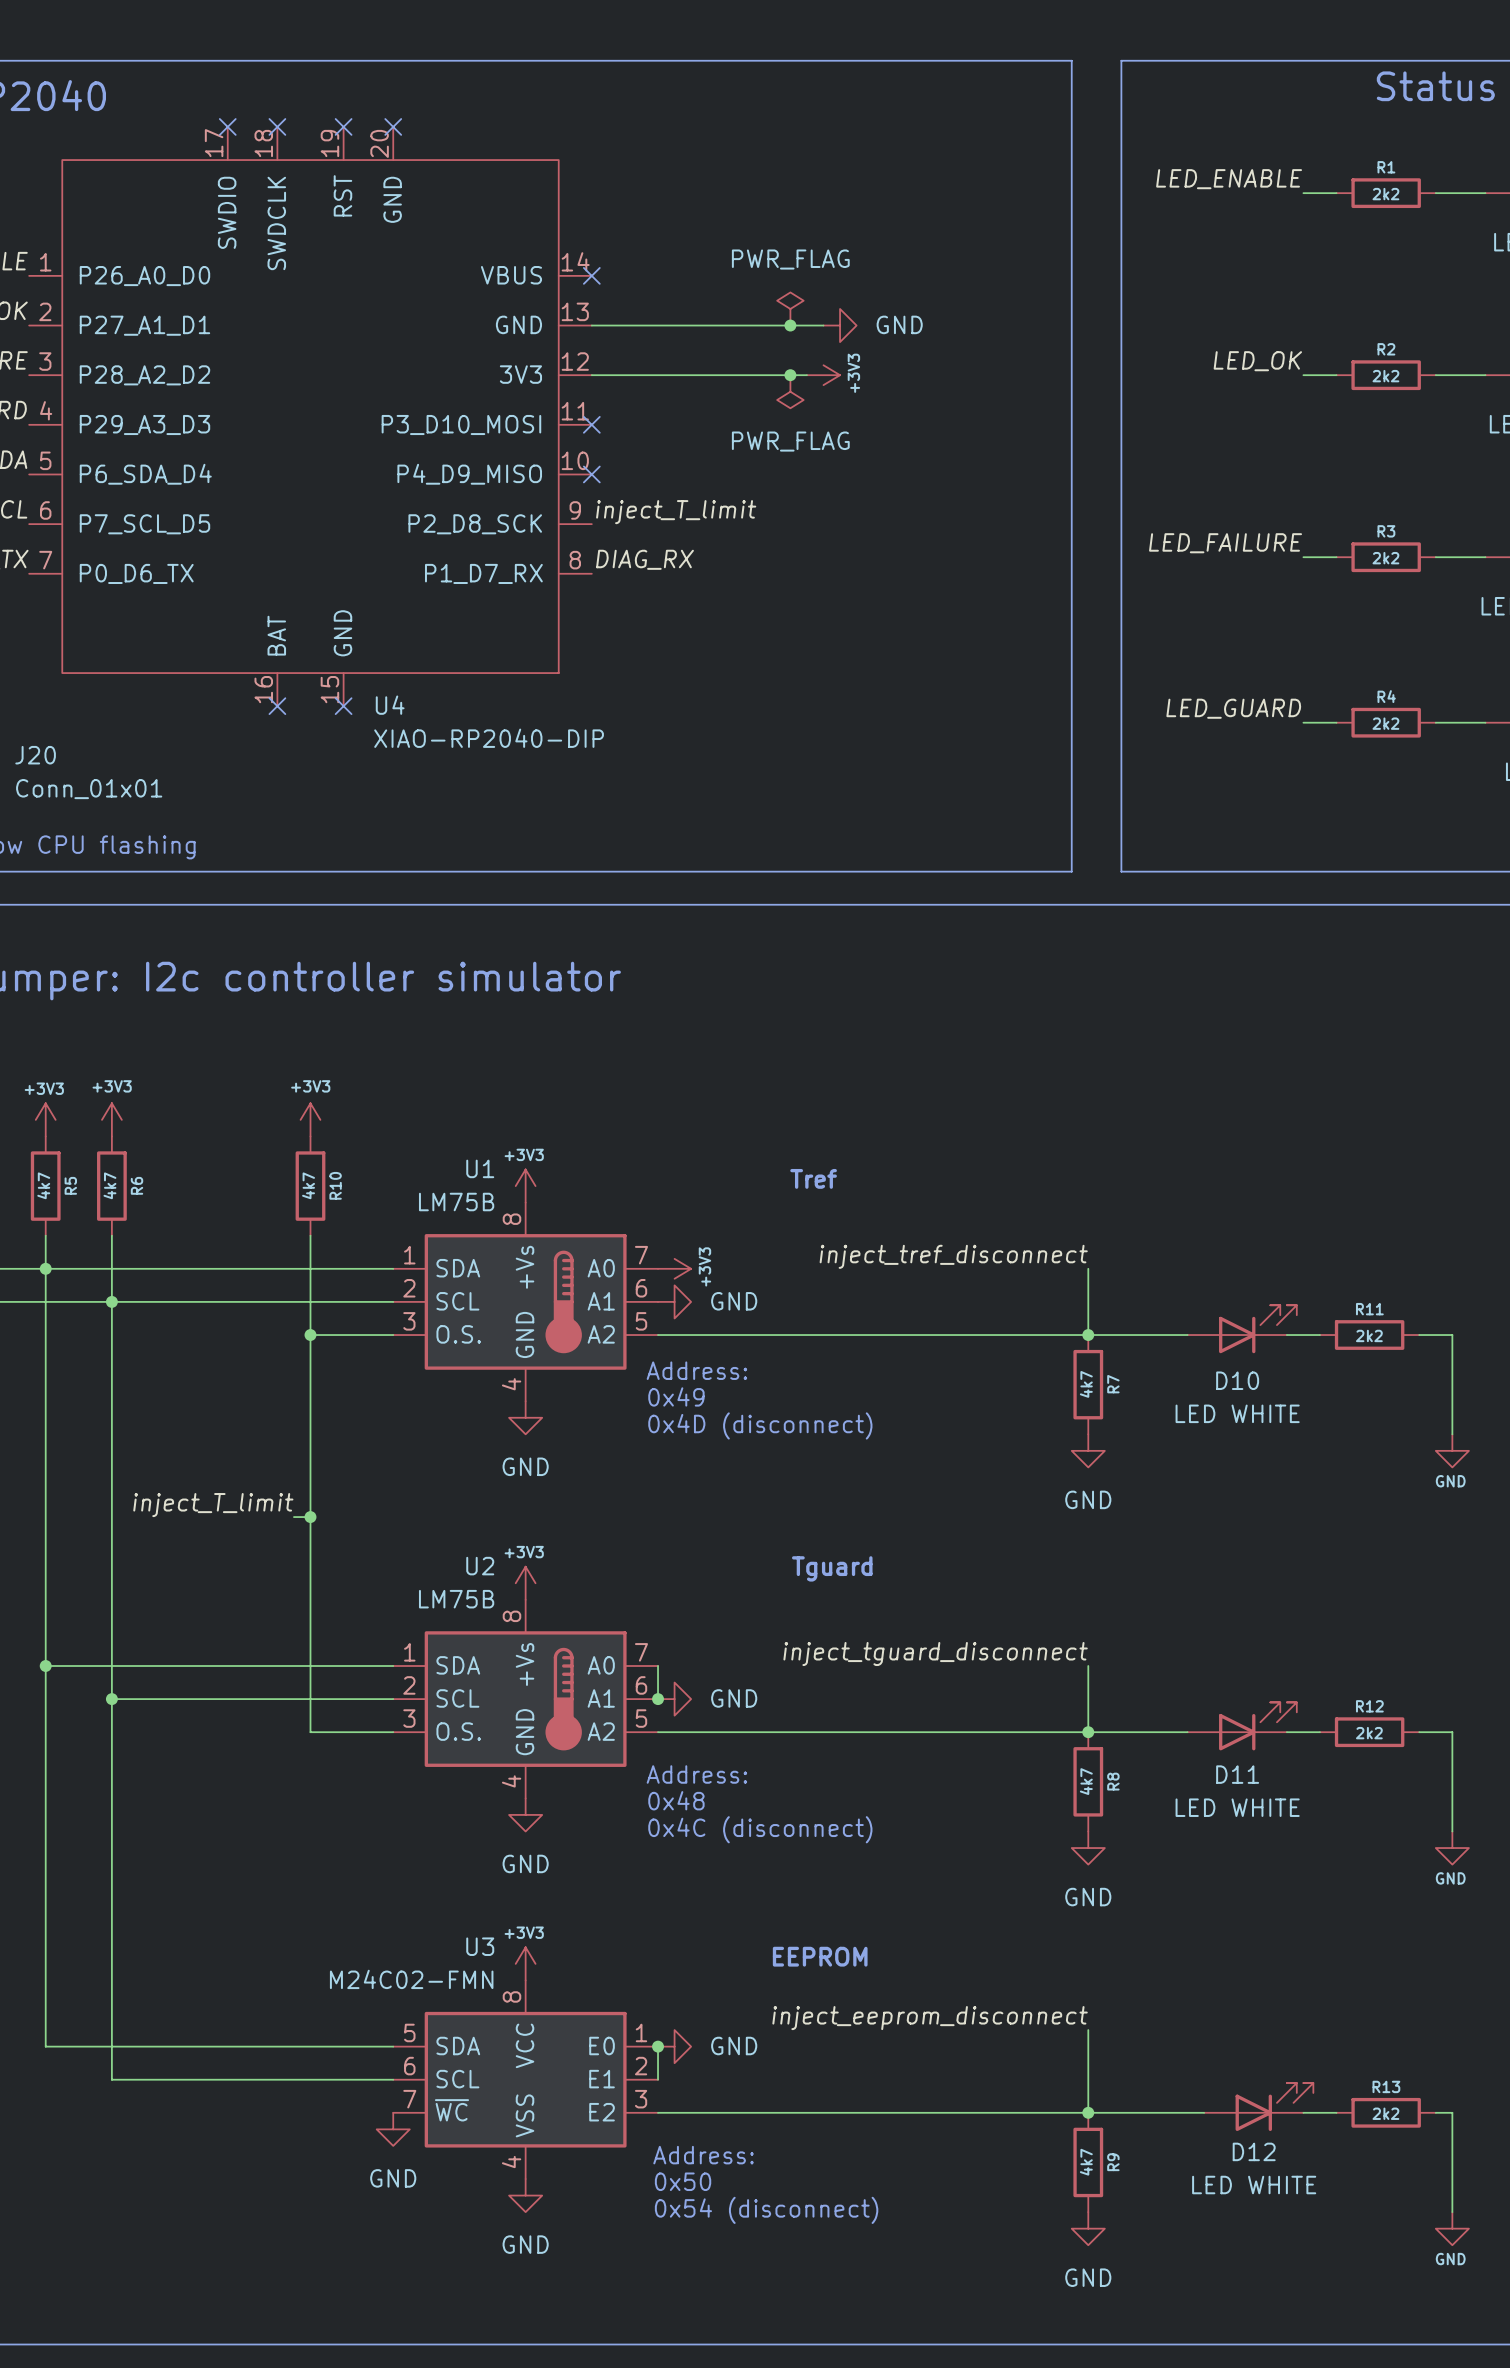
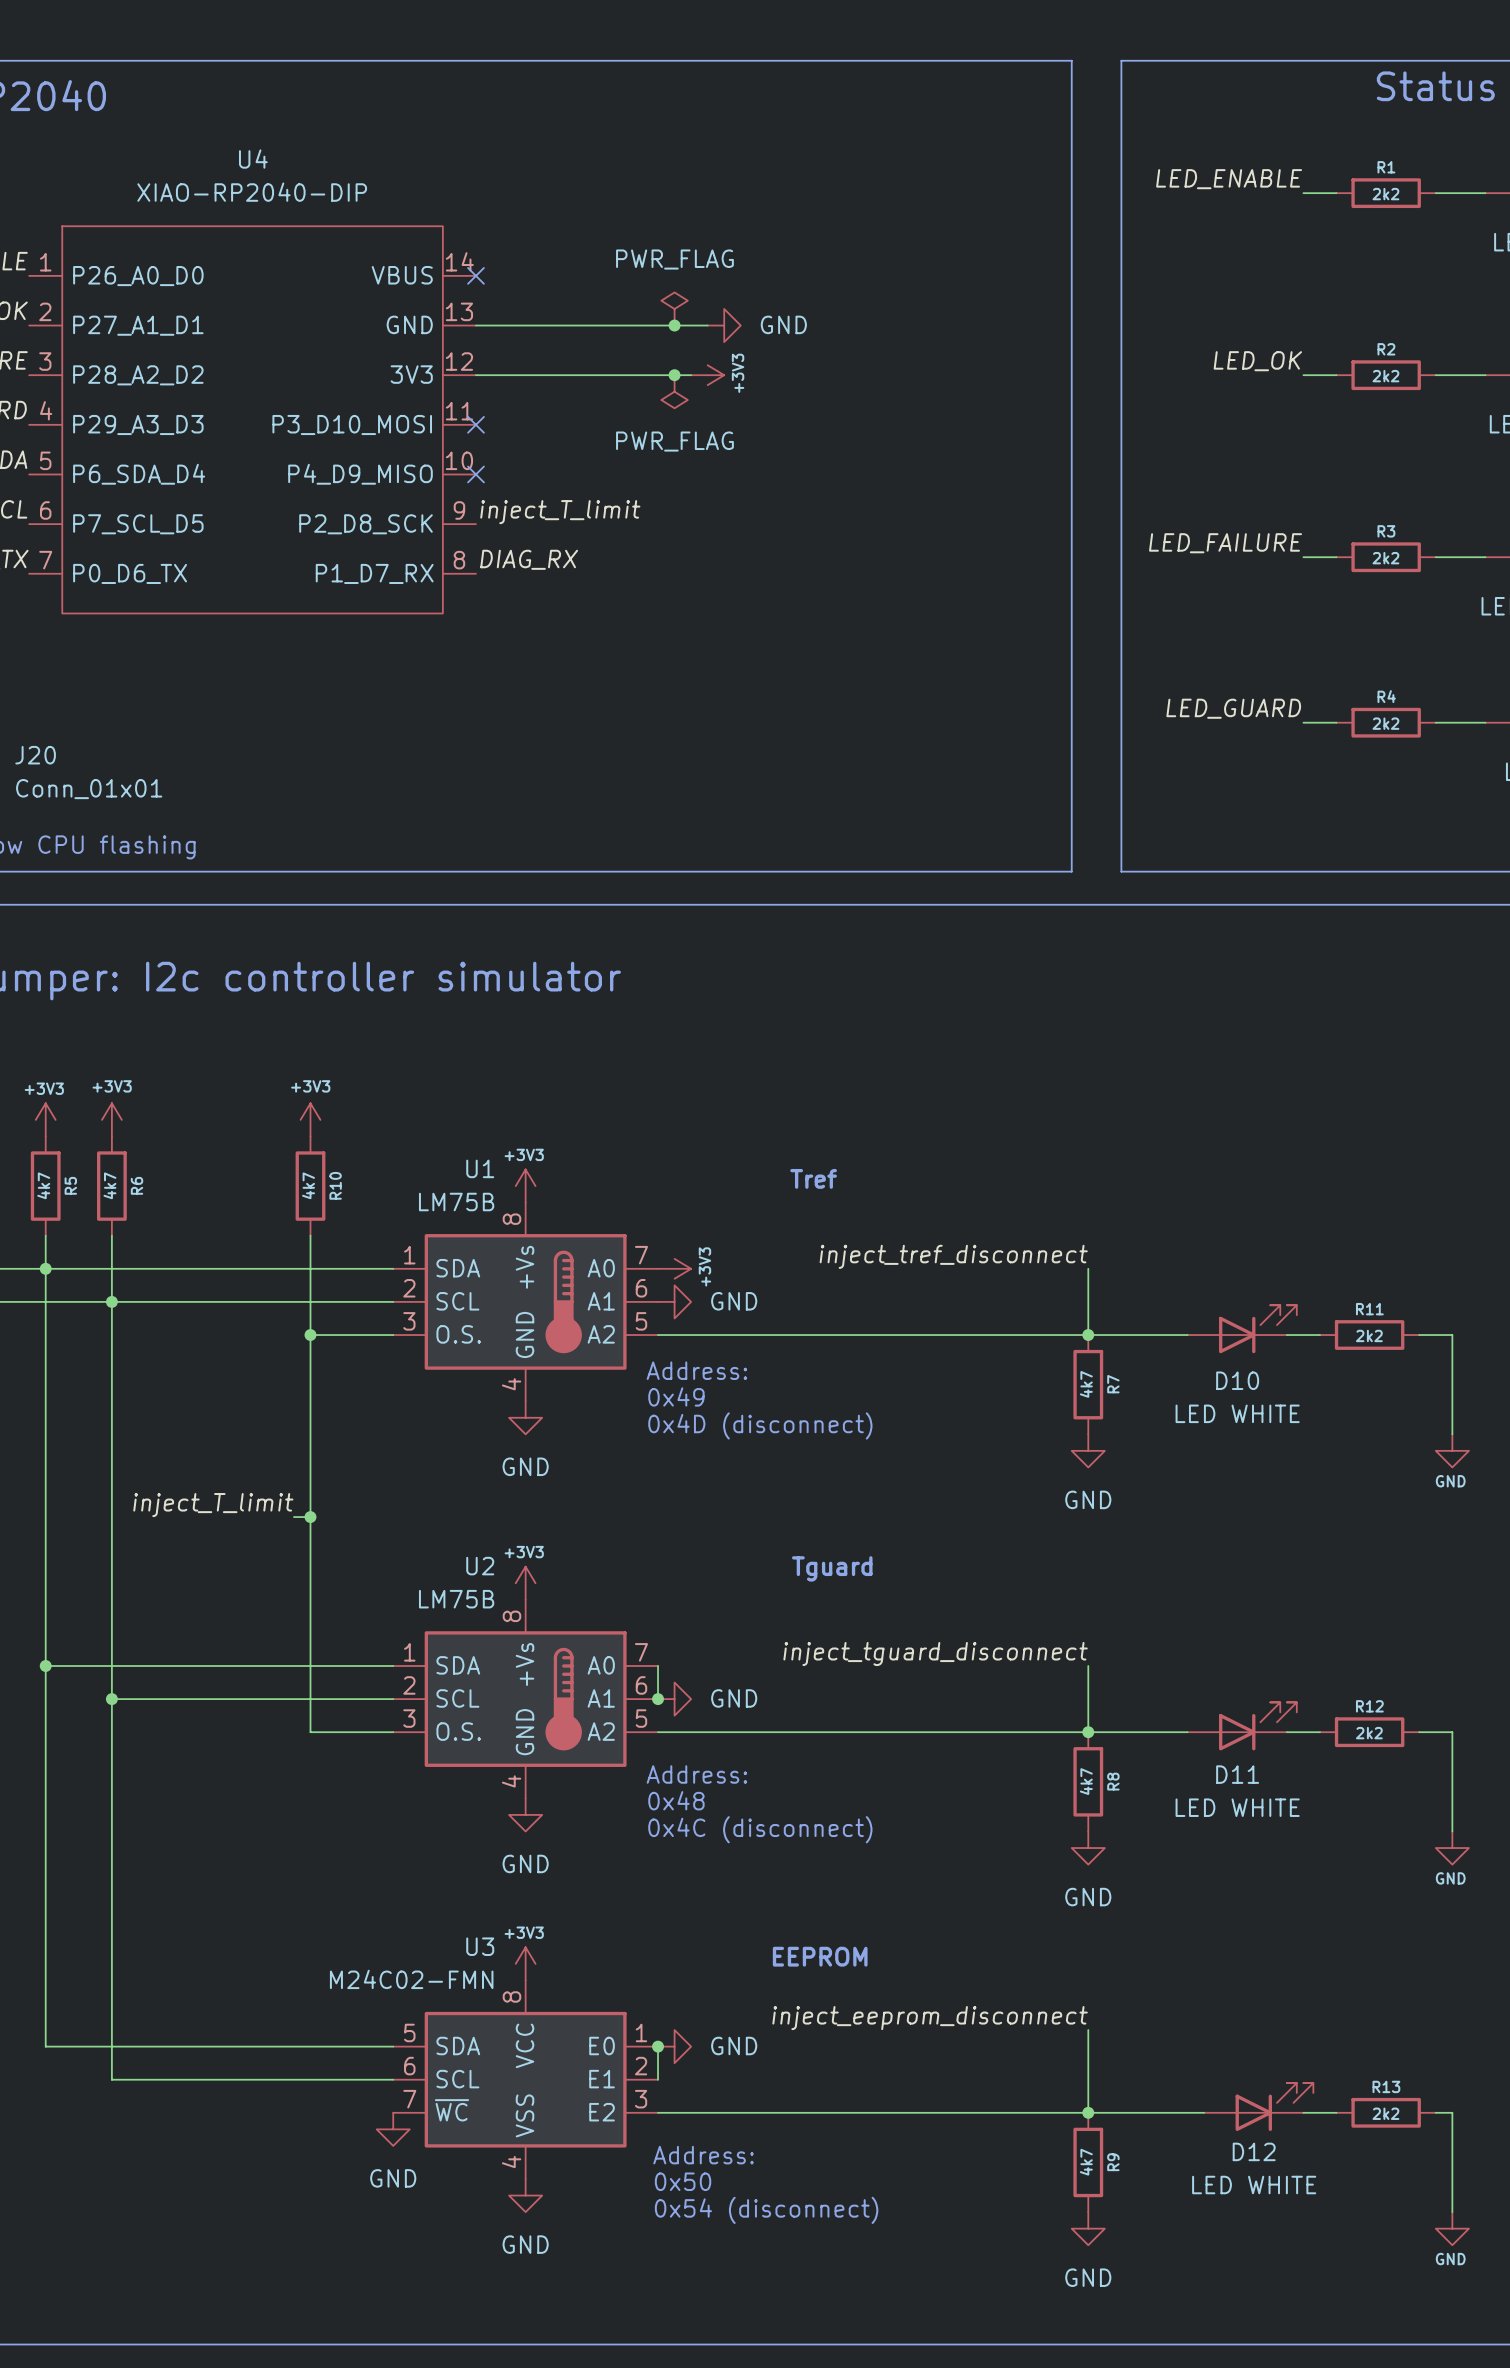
U4 symbol: [29, 126, 592, 707] -> [29, 226, 476, 614]
no-connect mark: (227, 126) -> none
no-connect mark: (277, 126) -> none
no-connect mark: (343, 126) -> none
no-connect mark: (393, 126) -> none
no-connect mark: none -> (475, 275)
no-connect mark: (591, 275) -> none
power symbol: none -> PWR_FLAG (674, 308)
power symbol: PWR_FLAG (790, 308) -> none
junction: none -> (674, 325)
wire: (707, 325) (823, 325) -> (475, 325) (591, 325)
junction: (790, 325) -> none
power symbol position: GND (840, 325) -> GND (724, 325)
junction: none -> (674, 375)
wire: (691, 375) (806, 375) -> (475, 375) (591, 375)
junction: (790, 375) -> none
power symbol position: +3V3 (823, 375) -> +3V3 (707, 375)
power symbol: none -> PWR_FLAG (674, 391)
power symbol: PWR_FLAG (790, 391) -> none
no-connect mark: none -> (475, 424)
no-connect mark: (591, 424) -> none
no-connect mark: none -> (475, 474)
no-connect mark: (591, 474) -> none
label position: inject_T_limit (676, 512) -> inject_T_limit (560, 512)
label position: DIAG_RX (644, 559) -> DIAG_RX (529, 559)
U4 name position: U4 (390, 705) -> U4 (253, 159)
no-connect mark: (277, 706) -> none
no-connect mark: (343, 706) -> none
U4 value position: XIAO-RP2040-DIP (489, 738) -> XIAO-RP2040-DIP (252, 192)

